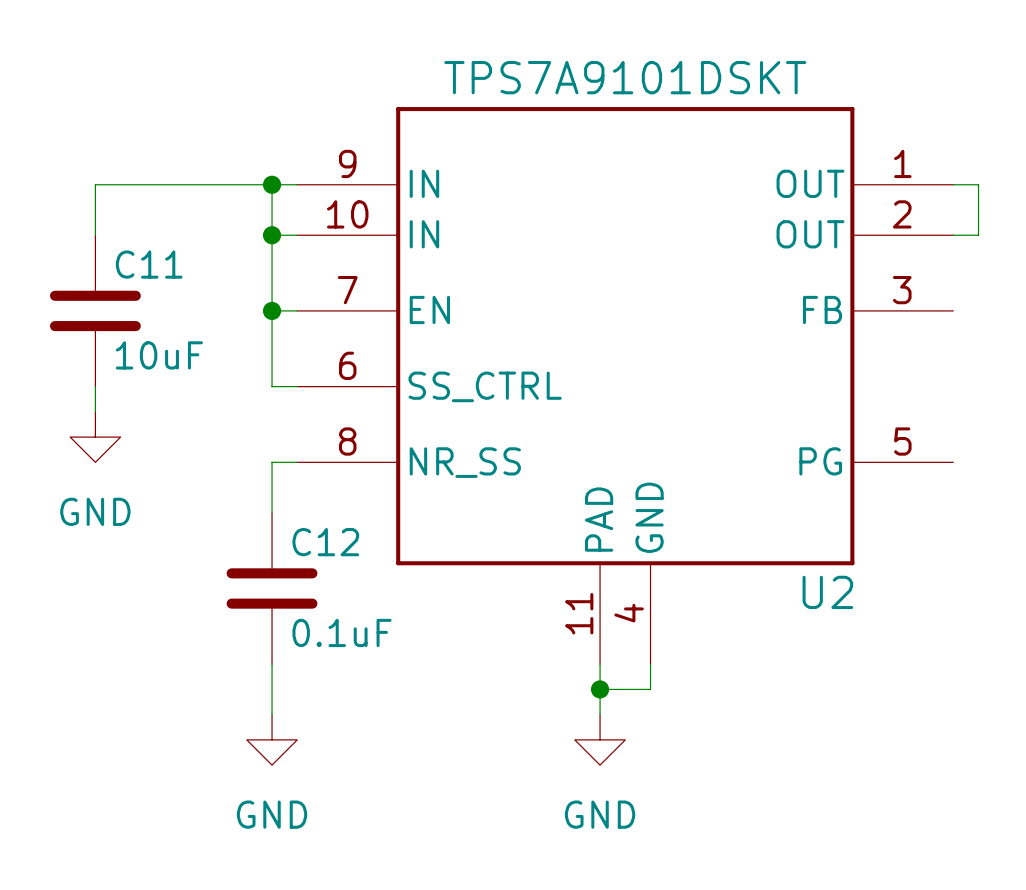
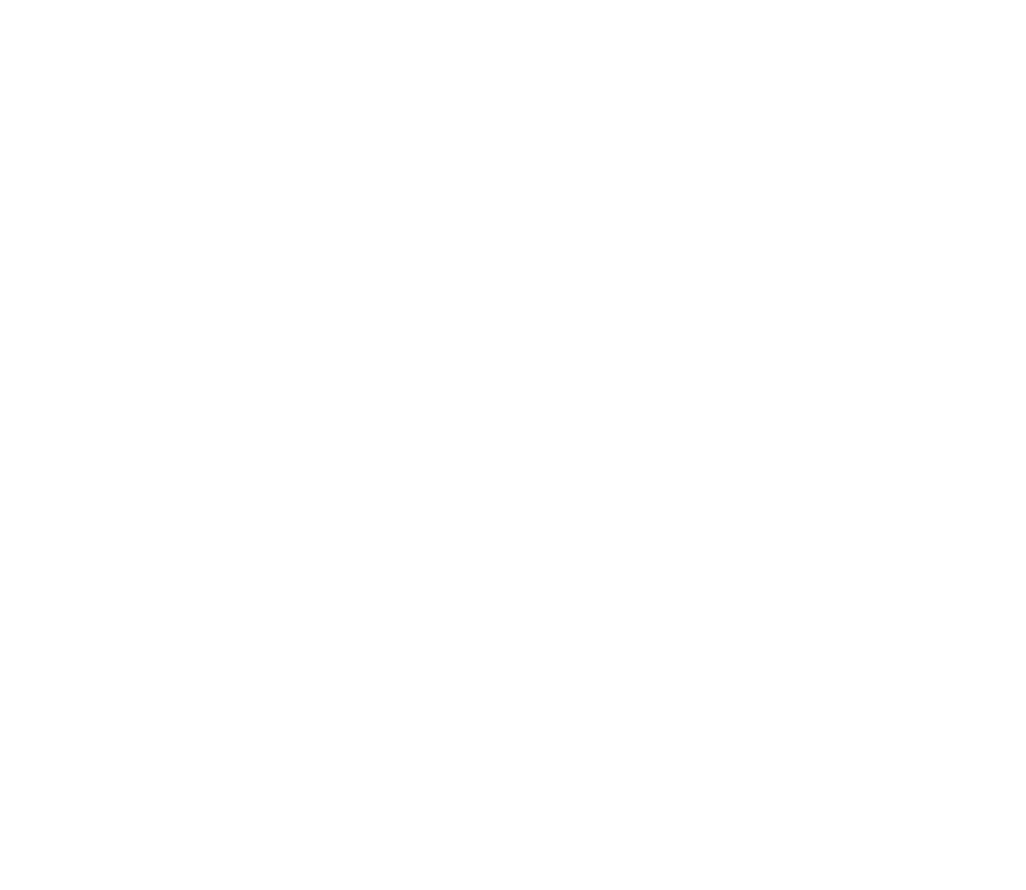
wire: (272, 184) (272, 386) (297, 386) -> none
junction: (272, 184) -> none
wire: (297, 184) (95, 184) (95, 235) -> none
wire: (953, 184) (978, 184) (978, 235) (953, 235) -> none
wire: (272, 235) (297, 235) -> none
junction: (272, 235) -> none
C11: 10uF (95, 310) -> none
wire: (272, 310) (297, 310) -> none
junction: (272, 310) -> none
U2: TPS7A9101DSKT (625, 385) -> none
wire: (95, 386) (95, 411) -> none
power symbol: GND (95, 437) -> none
wire: (297, 462) (272, 462) (272, 512) -> none
C12: 0.1uF (272, 588) -> none
wire: (272, 664) (272, 714) -> none
wire: (600, 664) (600, 714) -> none
wire: (650, 664) (650, 689) (600, 689) -> none
junction: (600, 689) -> none
power symbol: GND (272, 739) -> none
power symbol: GND (600, 739) -> none

